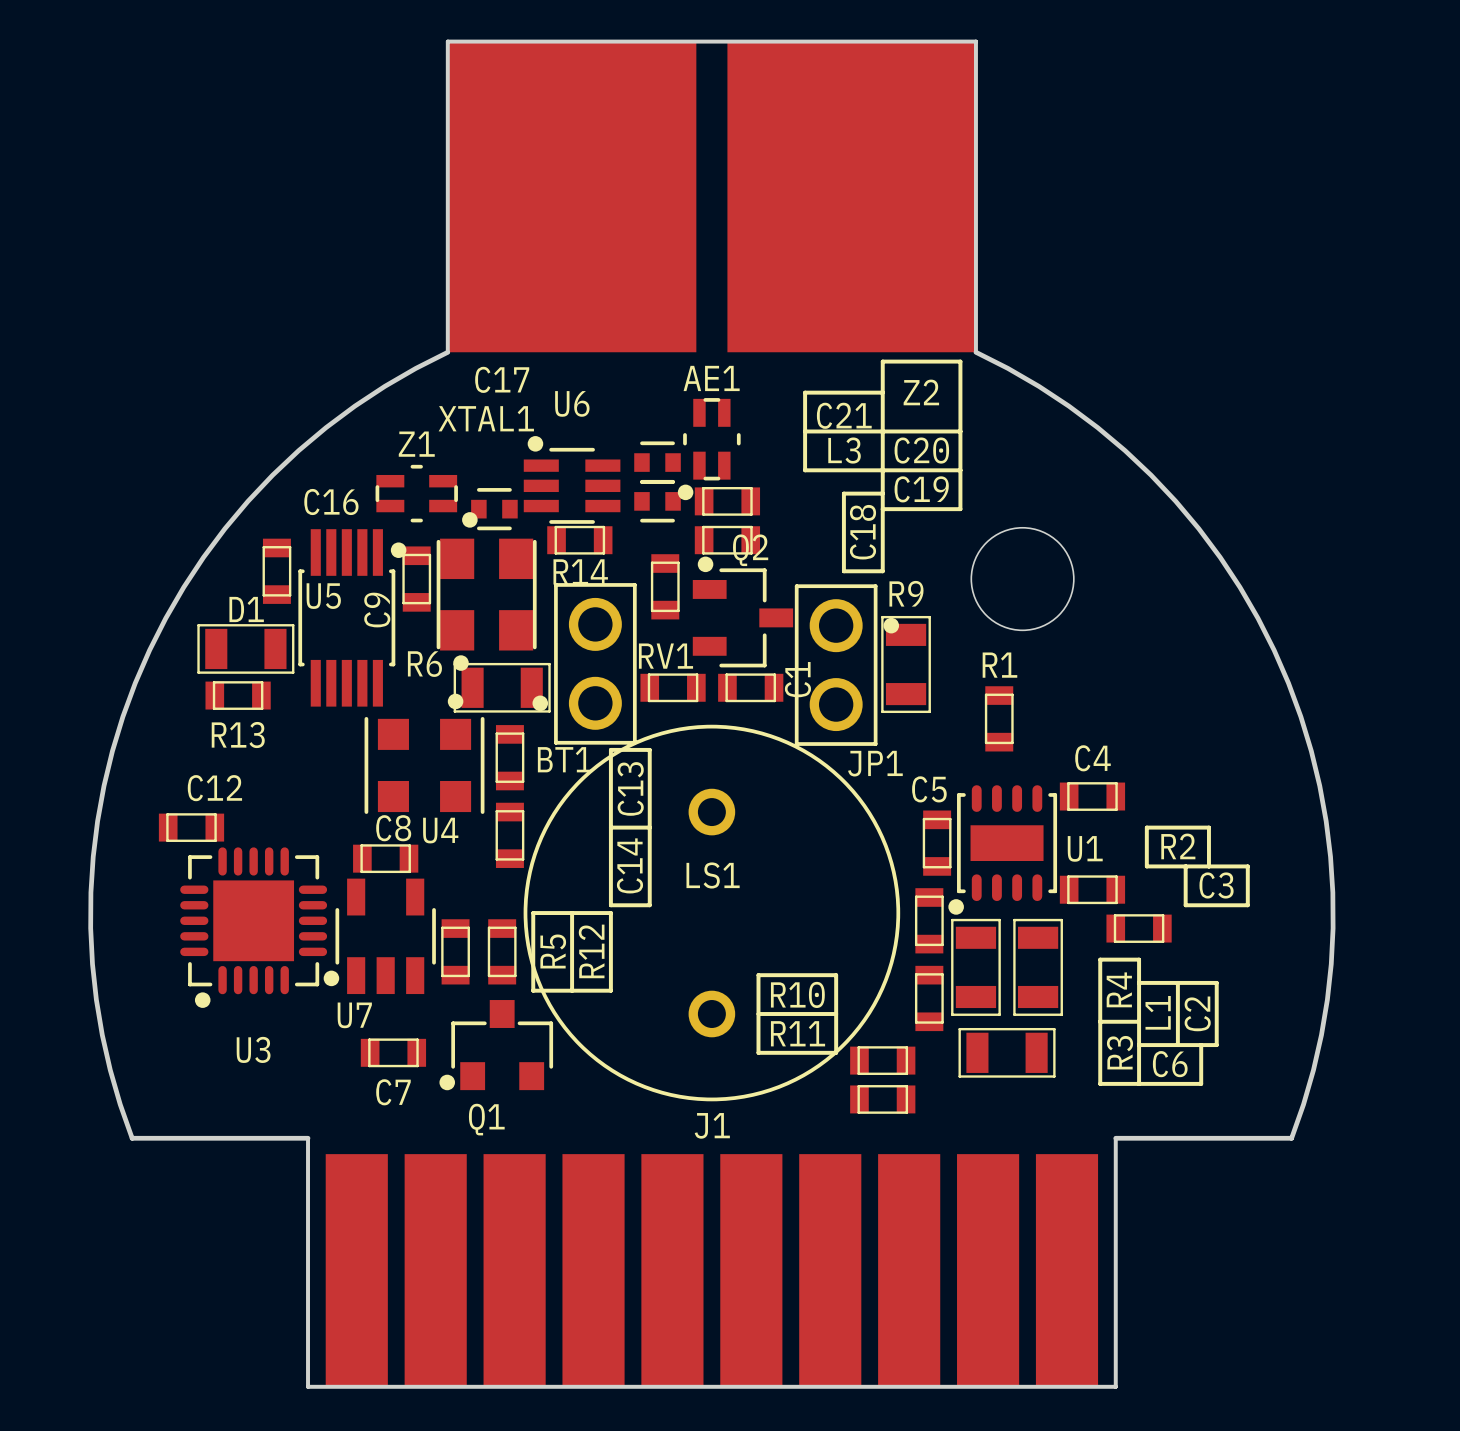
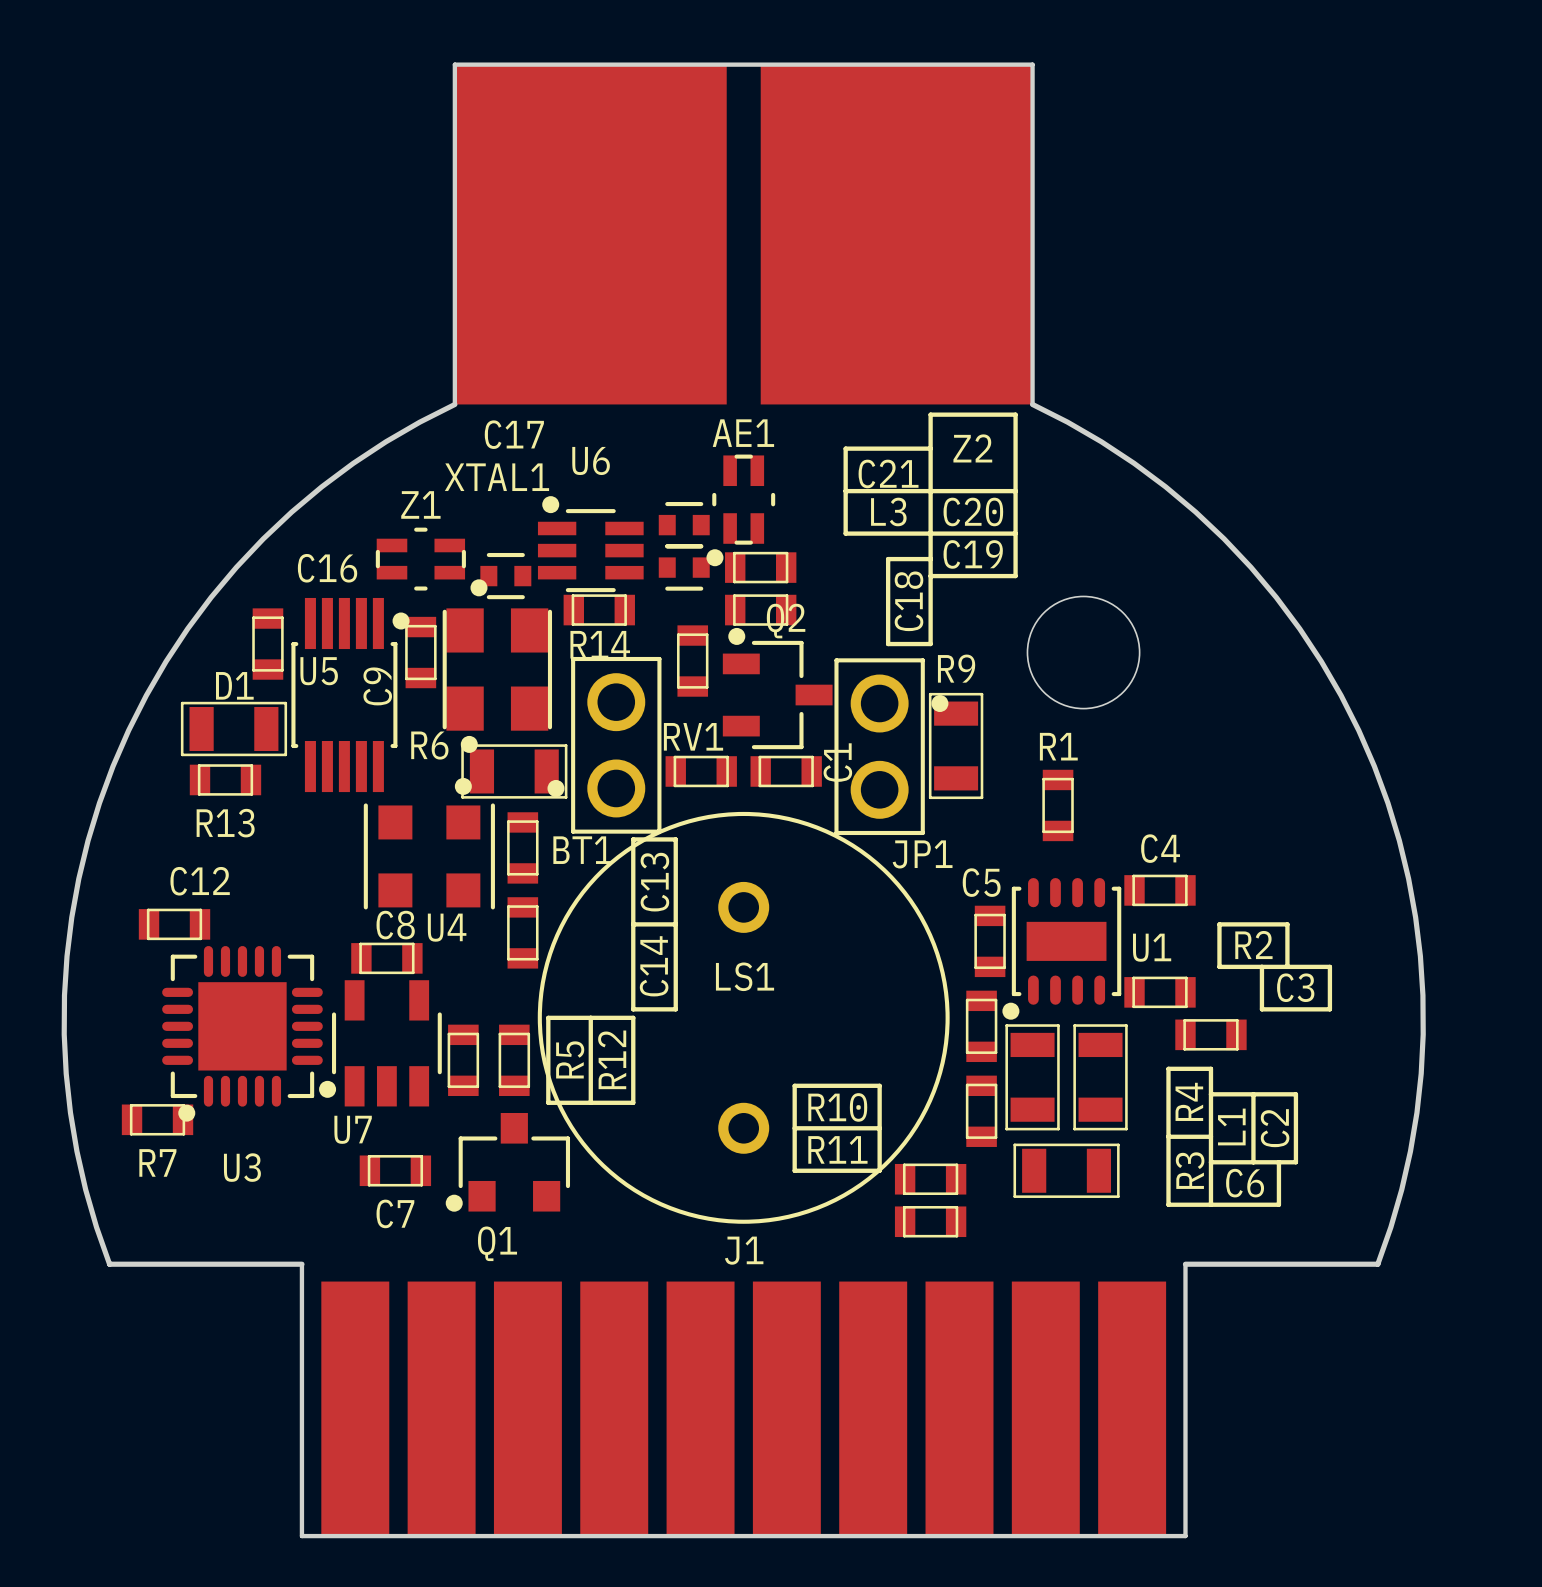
R7: none -> (157, 1119)

